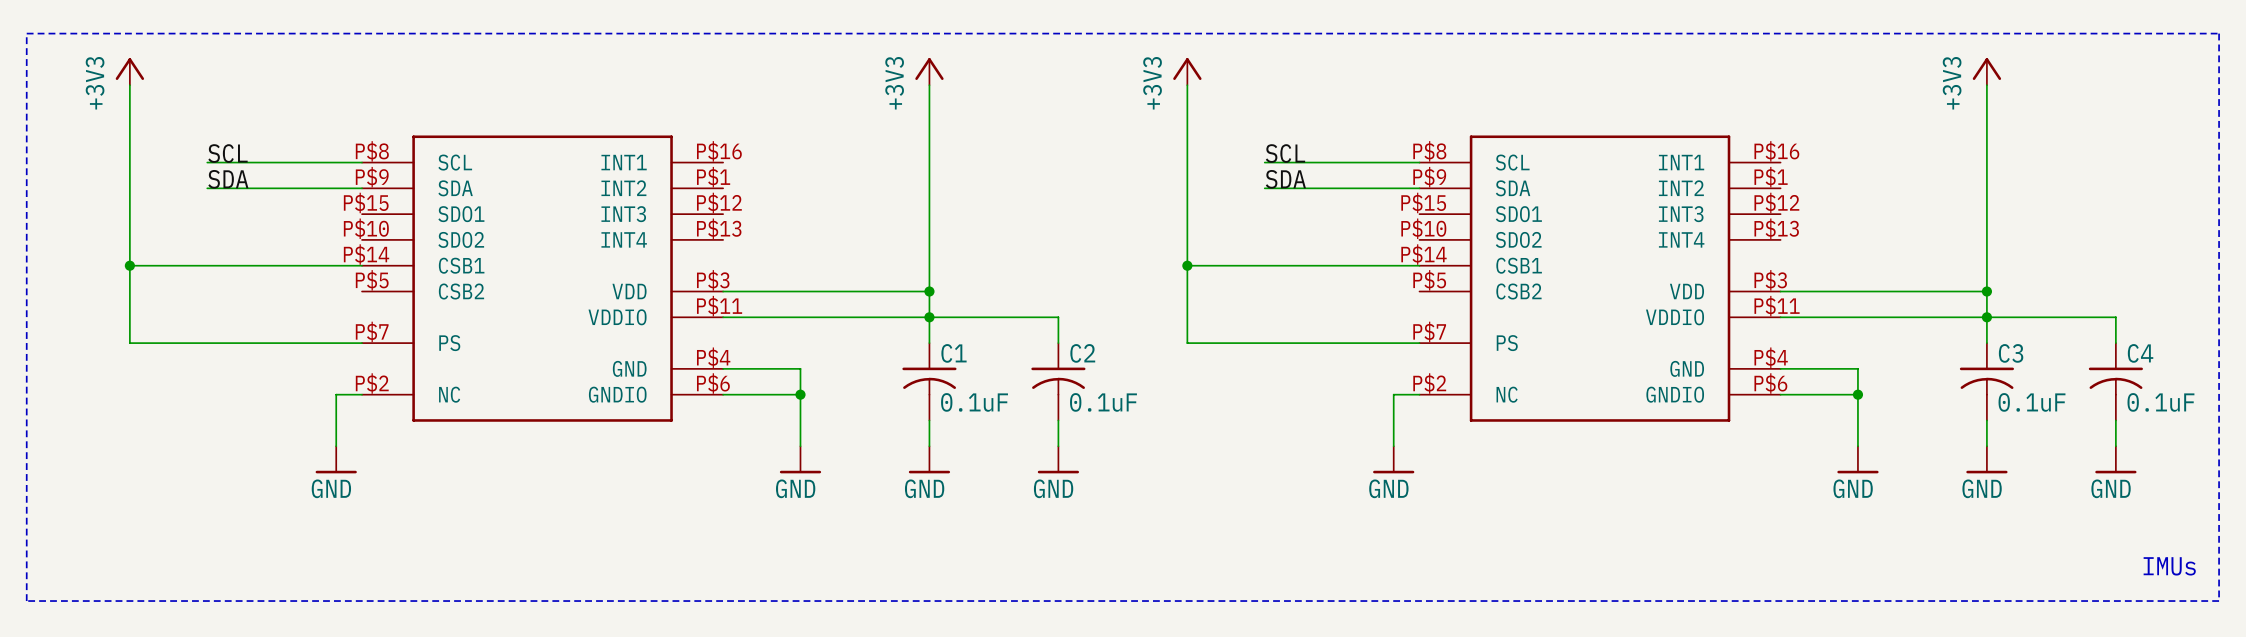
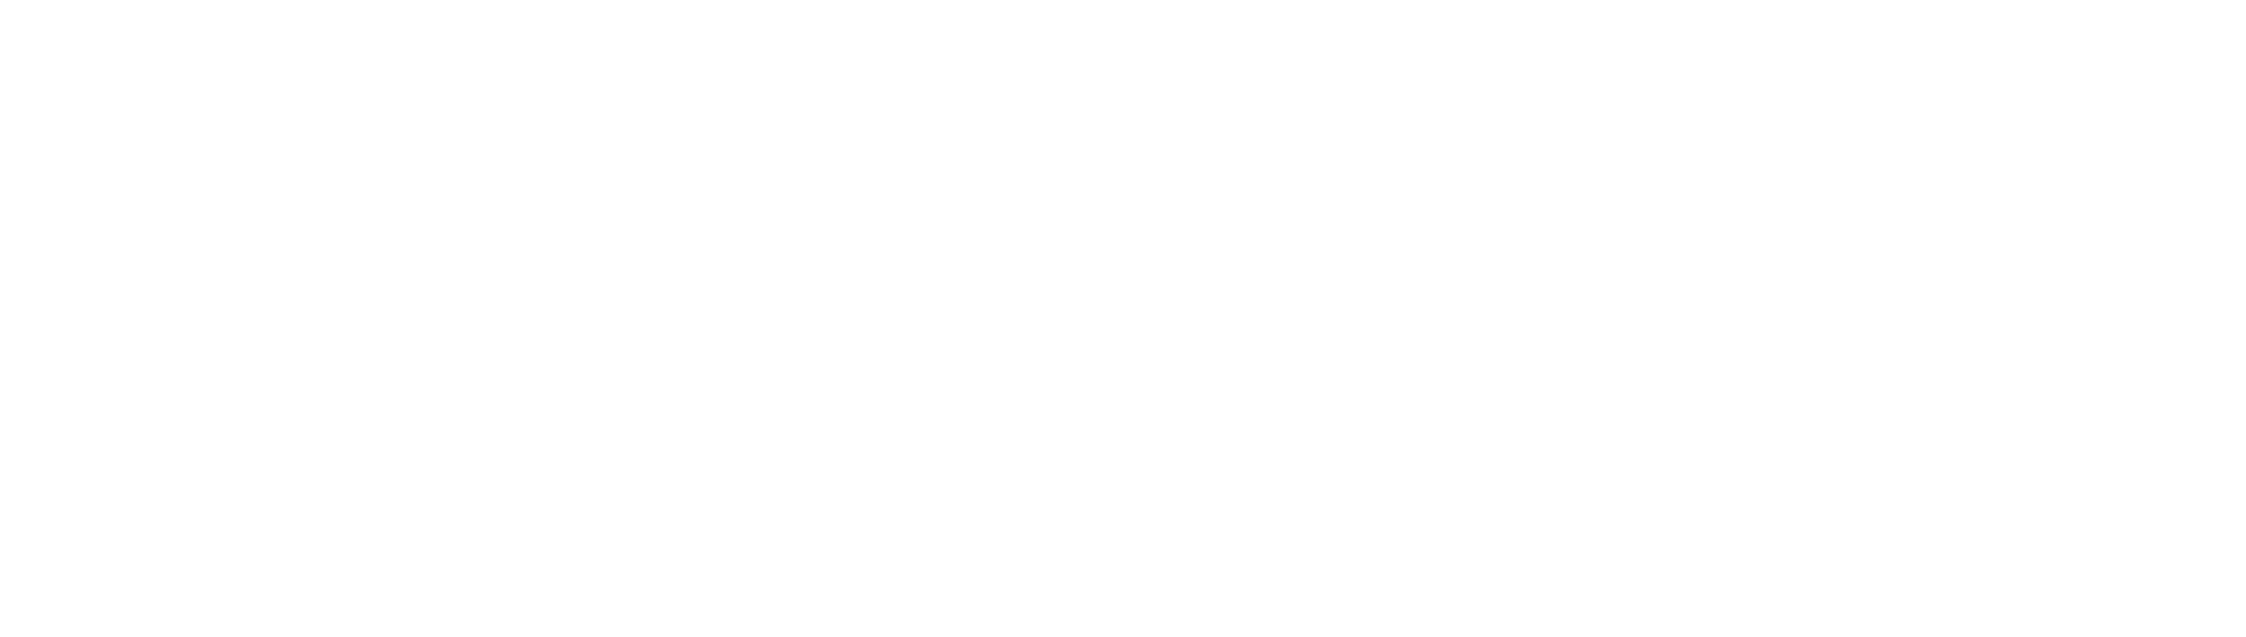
line: (26, 33) (2219, 33) (2219, 601) (26, 601) (26, 33) -> none
power symbol: +3V3 (129, 71) -> none
power symbol: +3V3 (929, 71) -> none
power symbol: +3V3 (1187, 71) -> none
power symbol: +3V3 (1986, 71) -> none
wire: (129, 85) (129, 343) (362, 343) -> none
wire: (929, 85) (929, 343) -> none
wire: (1187, 85) (1187, 343) (1419, 343) -> none
wire: (1986, 85) (1986, 343) -> none
label: SCL (227, 153) -> none
label: SCL (1285, 153) -> none
wire: (207, 162) (362, 162) -> none
wire: (1264, 162) (1419, 162) -> none
label: SDA (228, 179) -> none
label: SDA (1285, 179) -> none
wire: (207, 188) (362, 188) -> none
wire: (1264, 188) (1419, 188) -> none
wire: (129, 265) (362, 265) -> none
junction: (129, 265) -> none
wire: (1187, 265) (1419, 265) -> none
junction: (1187, 265) -> none
part: (542, 278) -> none
part: (1600, 278) -> none
wire: (723, 291) (929, 291) -> none
junction: (929, 291) -> none
wire: (1780, 291) (1986, 291) -> none
junction: (1986, 291) -> none
wire: (723, 317) (1058, 317) (1058, 343) -> none
junction: (929, 317) -> none
wire: (1780, 317) (2115, 317) (2115, 343) -> none
junction: (1986, 317) -> none
wire: (723, 368) (800, 368) (800, 446) -> none
wire: (1780, 368) (1857, 368) (1857, 446) -> none
C1: 0.1uF (929, 381) -> none
C2: 0.1uF (1058, 381) -> none
C3: 0.1uF (1986, 381) -> none
C4: 0.1uF (2115, 381) -> none
wire: (362, 394) (336, 394) (336, 446) -> none
wire: (723, 394) (800, 394) -> none
junction: (800, 394) -> none
wire: (1419, 394) (1393, 394) (1393, 446) -> none
wire: (1780, 394) (1857, 394) -> none
junction: (1857, 394) -> none
wire: (929, 420) (929, 446) -> none
wire: (1058, 420) (1058, 446) -> none
wire: (1986, 420) (1986, 446) -> none
wire: (2115, 420) (2115, 446) -> none
power symbol: GND (336, 459) -> none
power symbol: GND (800, 459) -> none
power symbol: GND (929, 459) -> none
power symbol: GND (1058, 459) -> none
power symbol: GND (1393, 459) -> none
power symbol: GND (1857, 459) -> none
power symbol: GND (1986, 459) -> none
power symbol: GND (2115, 459) -> none
text: IMUs (2169, 566) -> none

